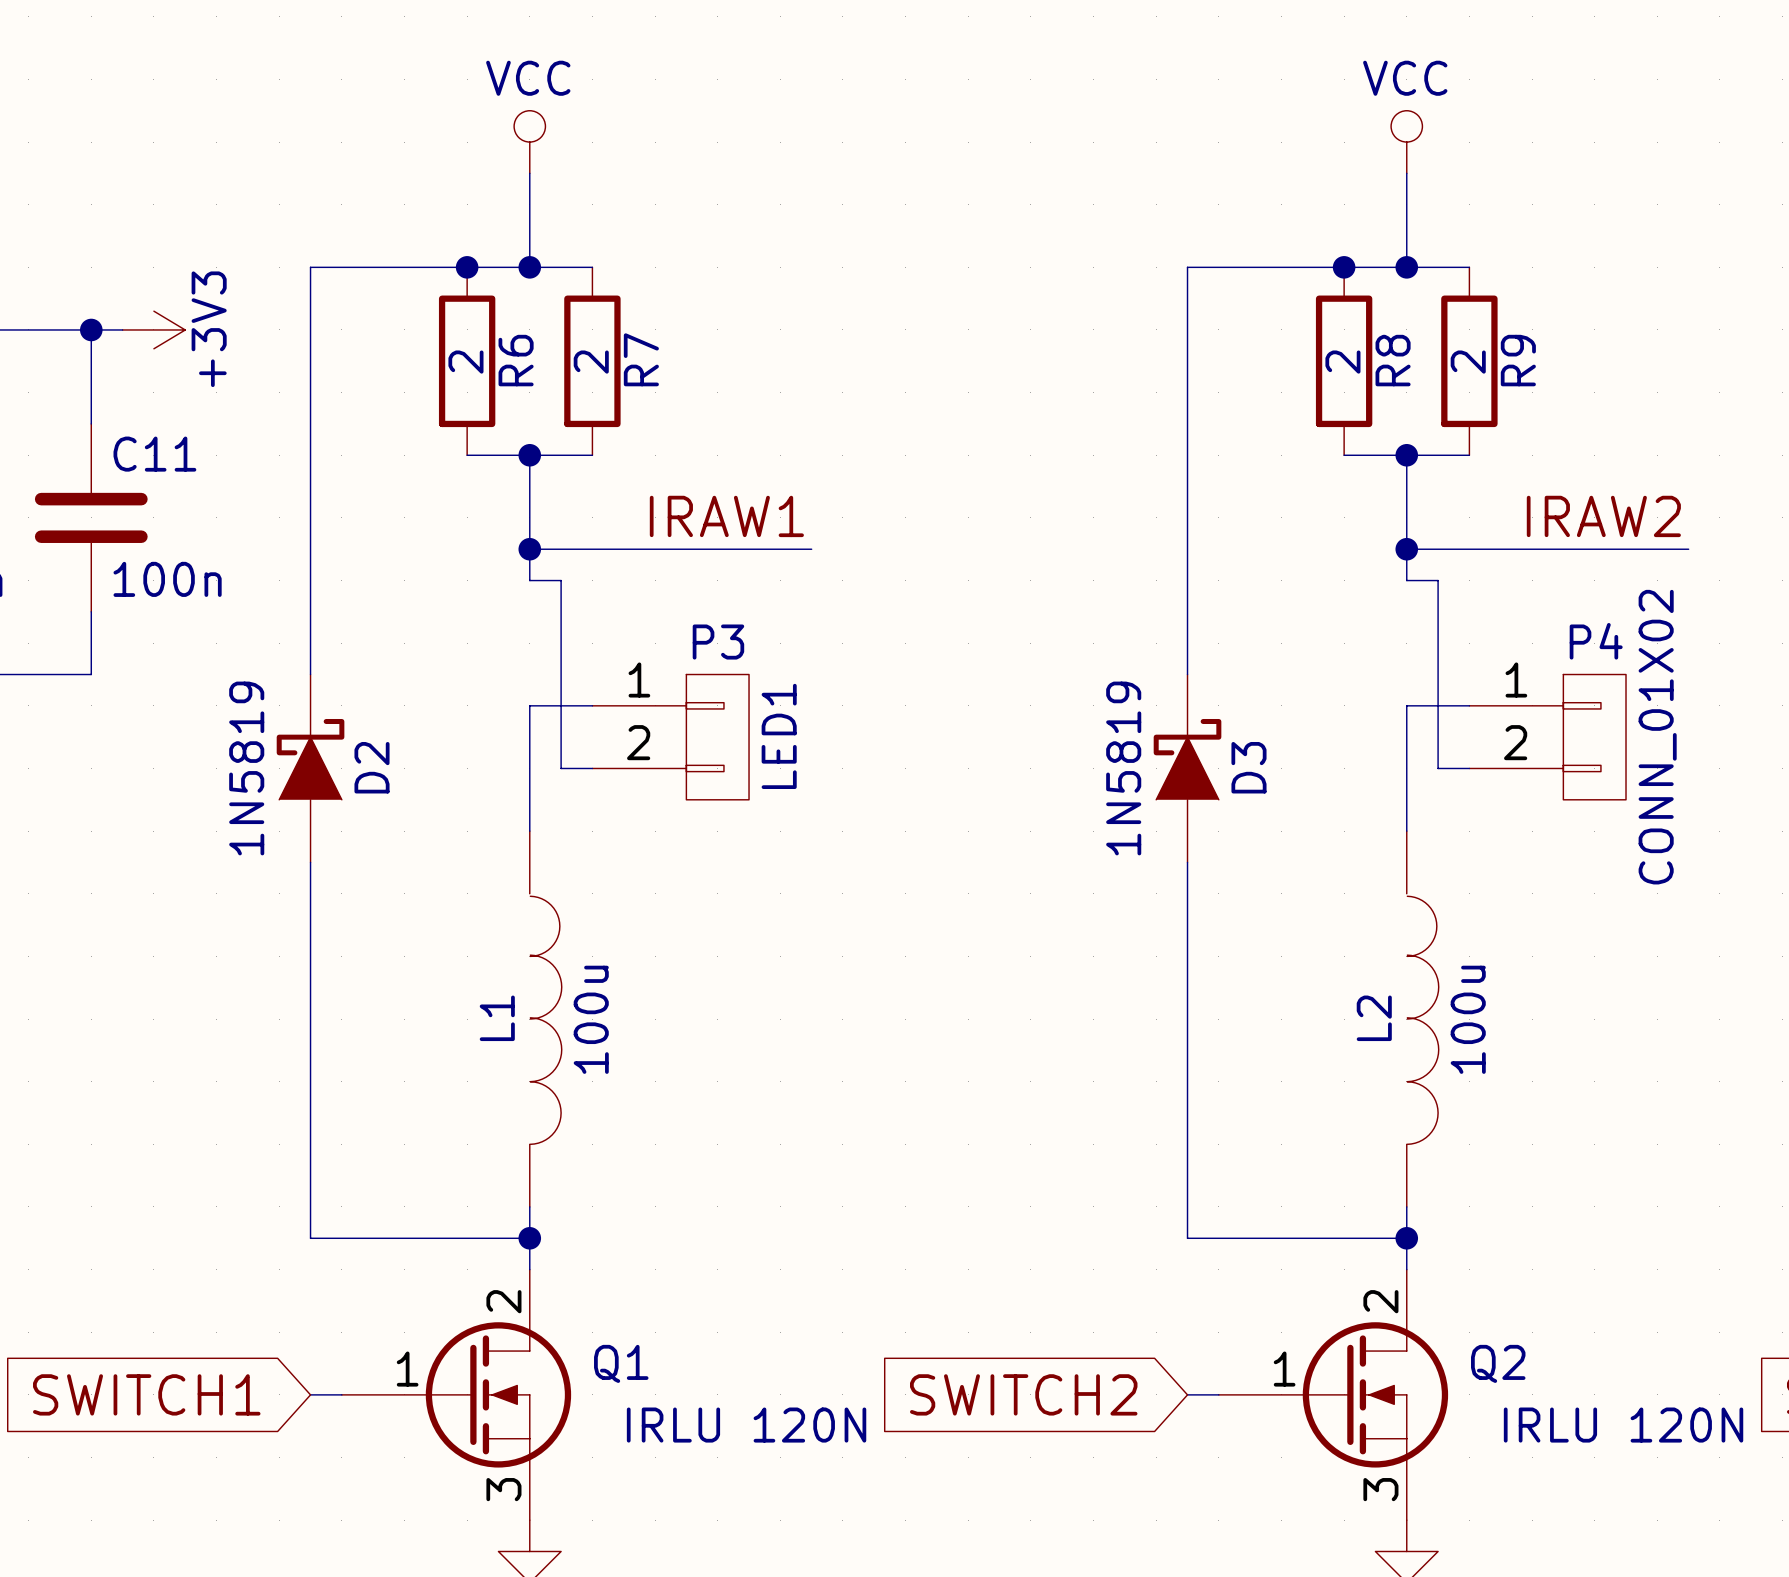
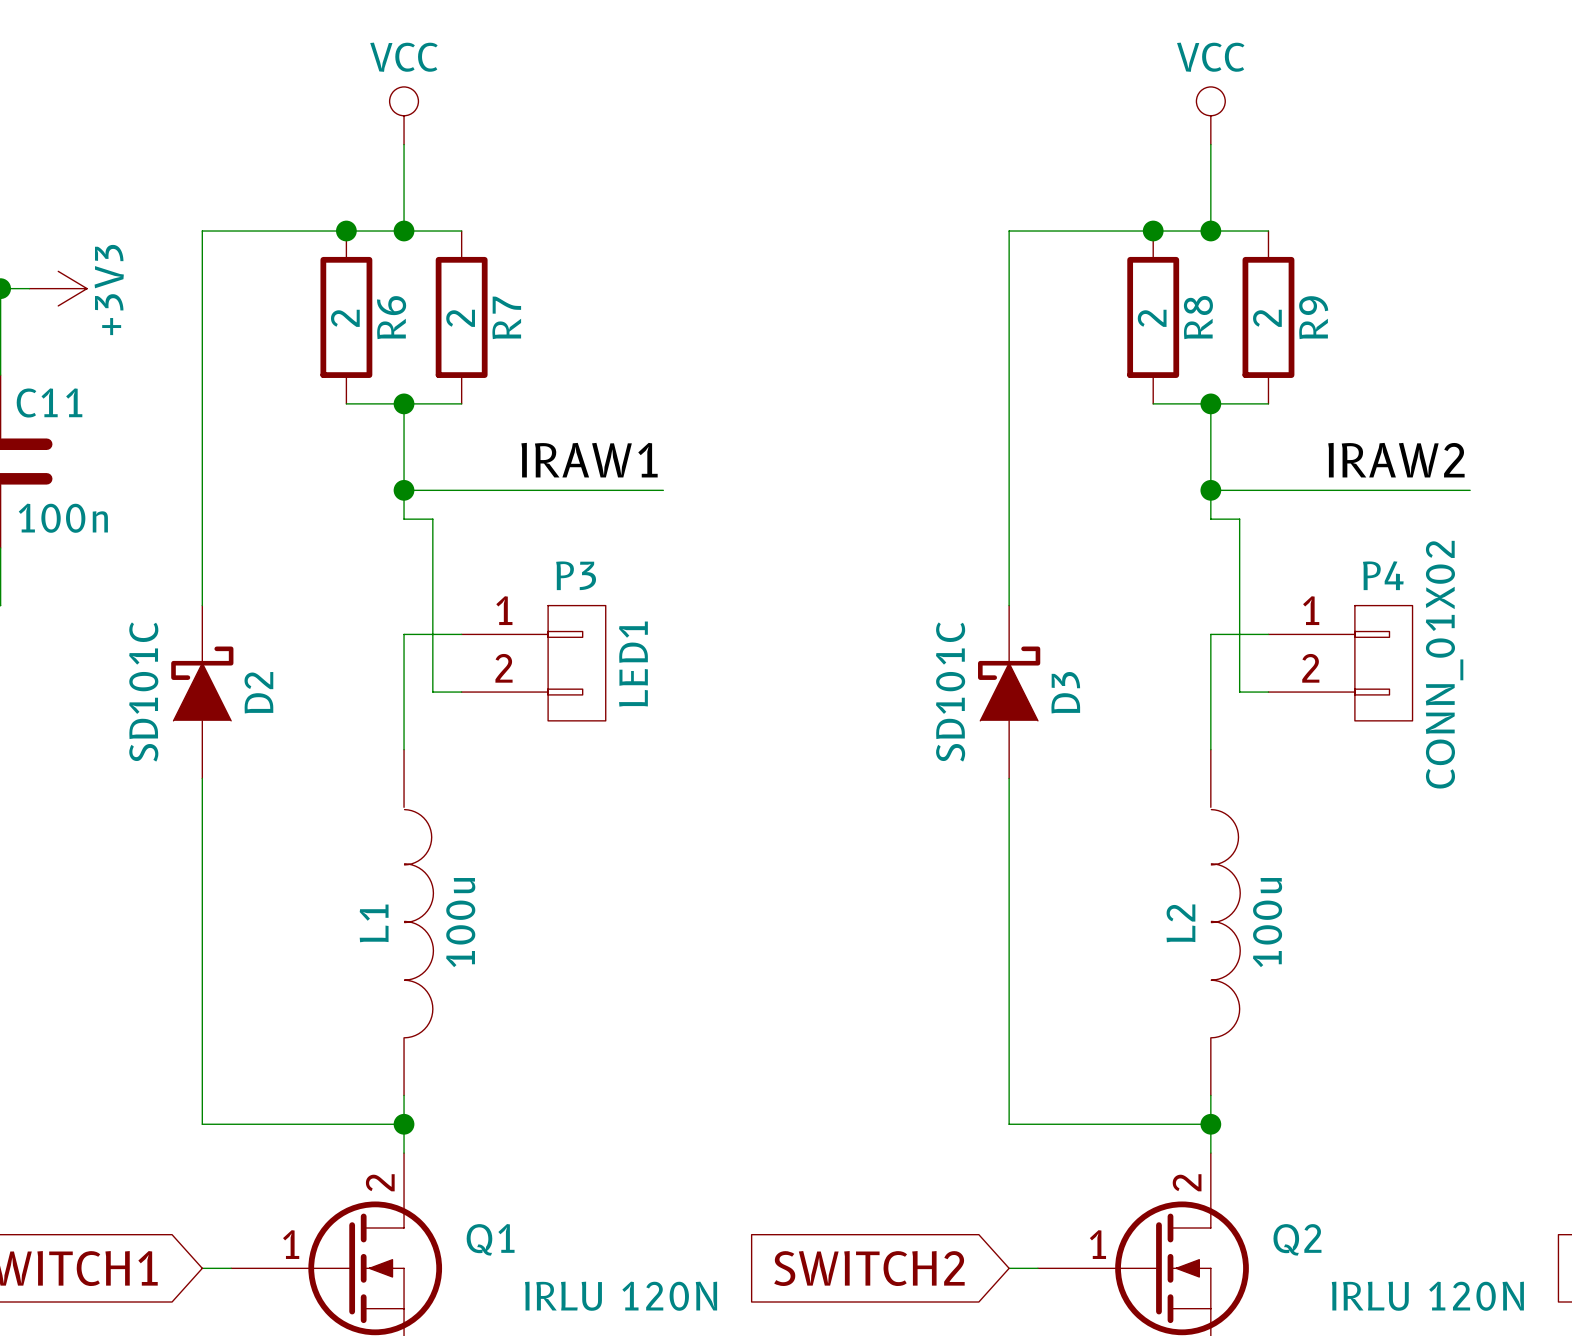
D2 value: 1N5819 (246, 768) -> SD101C (143, 691)
D3 value: 1N5819 (1123, 768) -> SD101C (950, 691)

